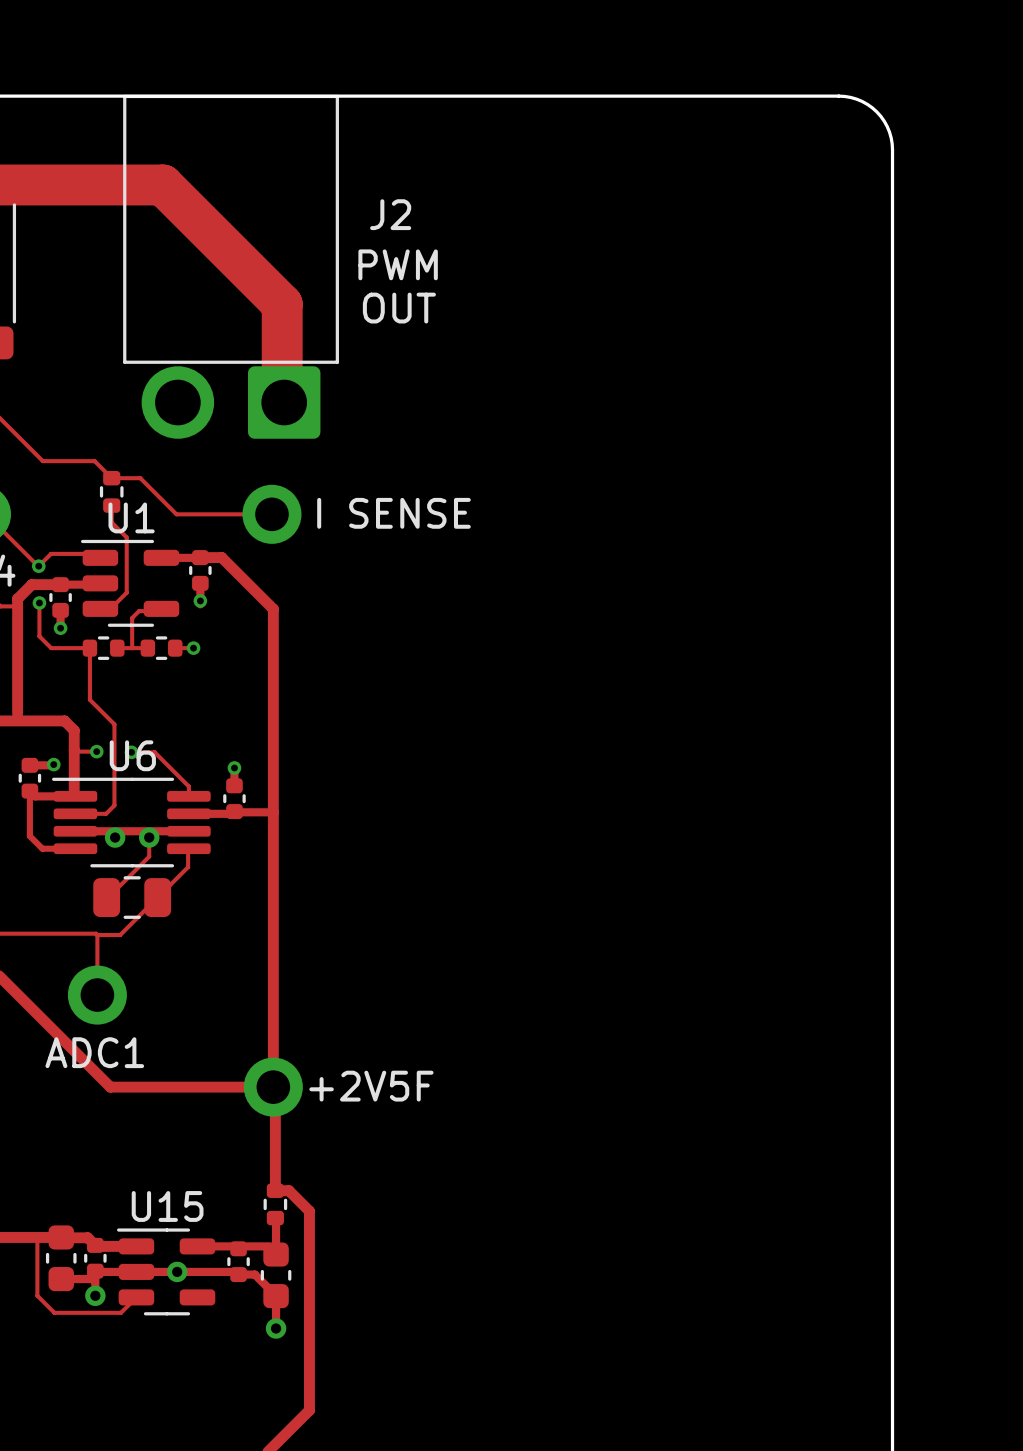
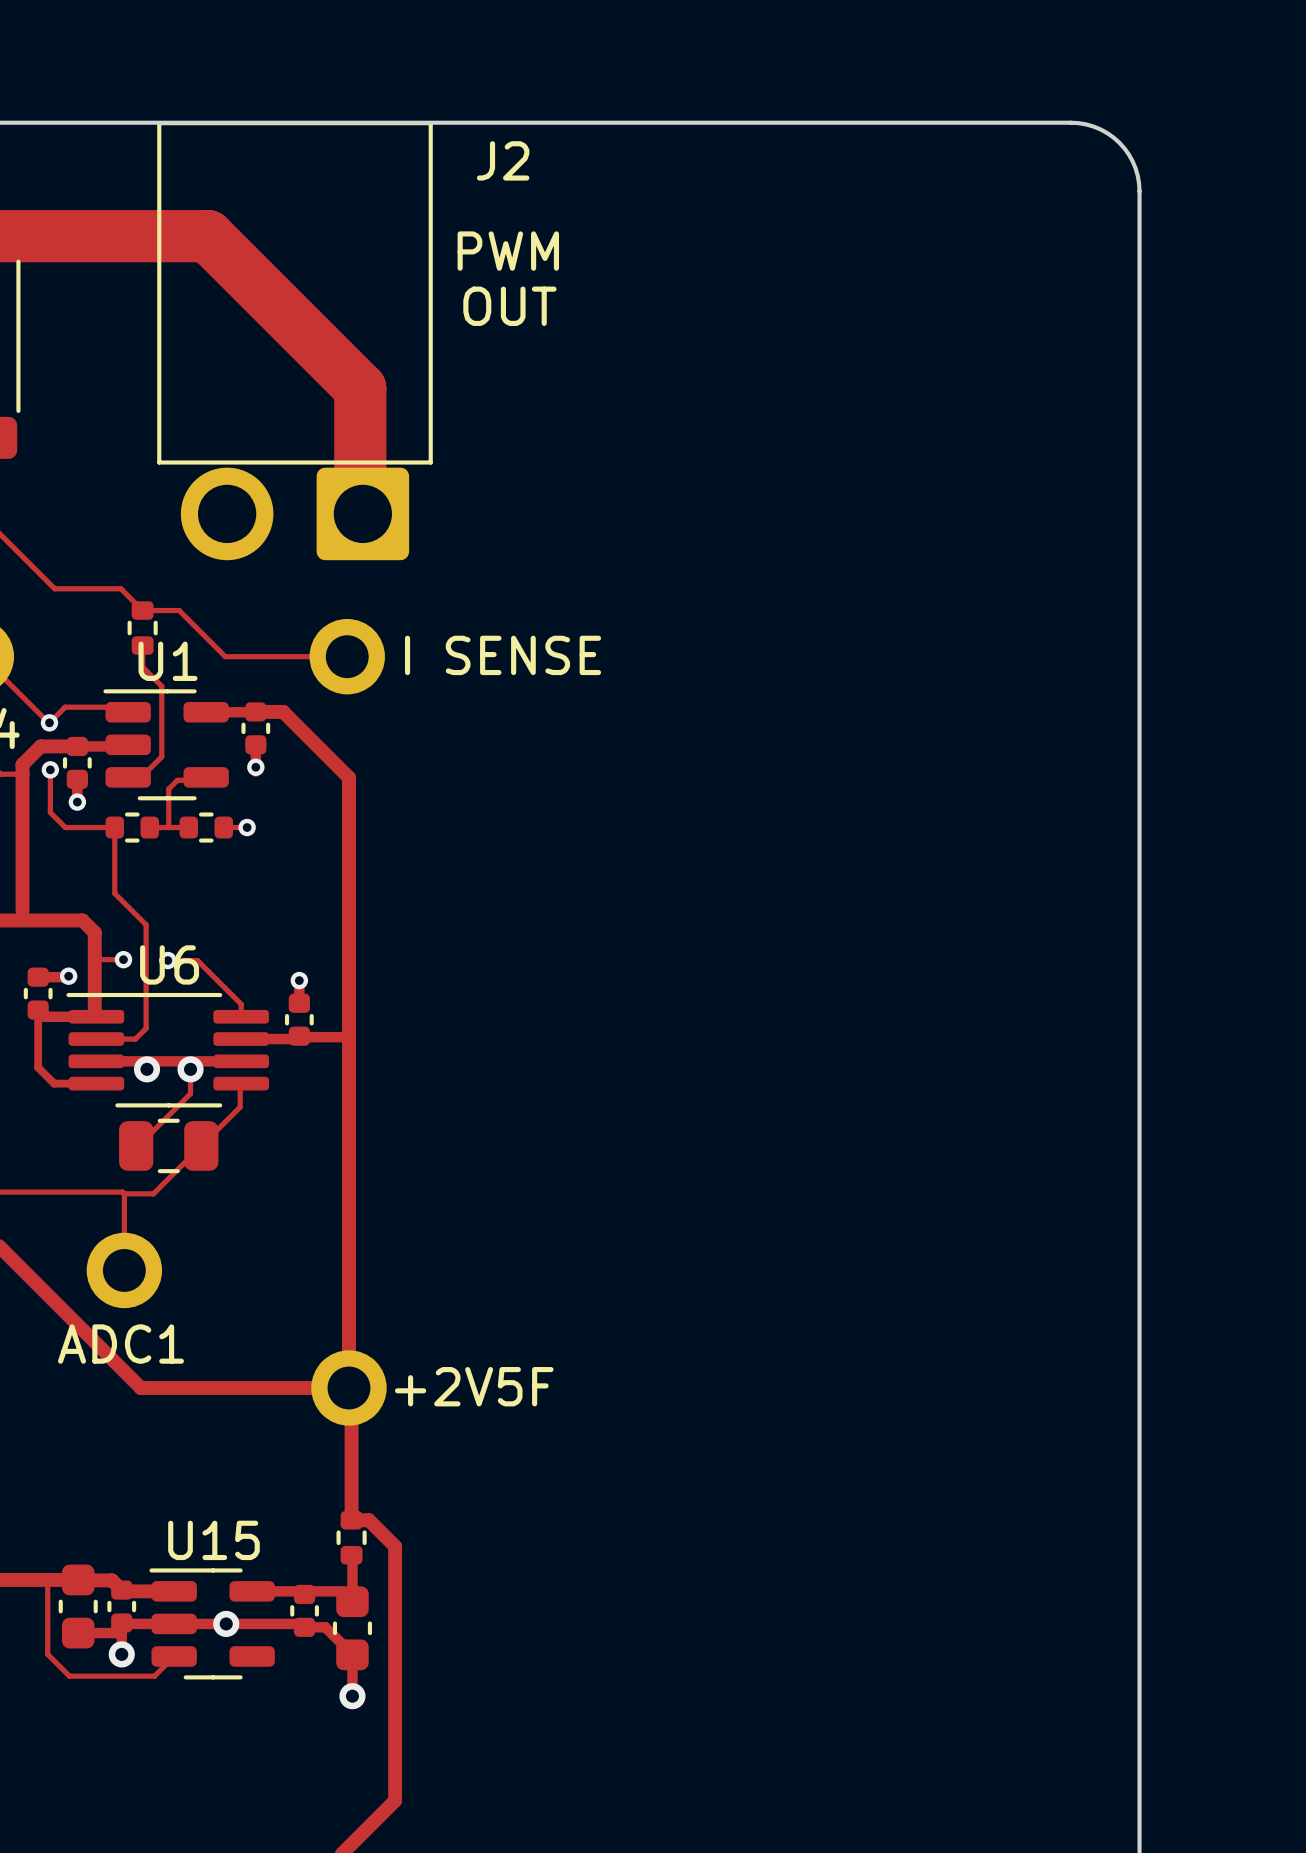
text: none -> PWM (508, 251)
J2 name position: J2 (390, 214) -> J2 (503, 160)
text: PWM (398, 264) -> OUT (509, 306)
text: OUT (399, 308) -> none

